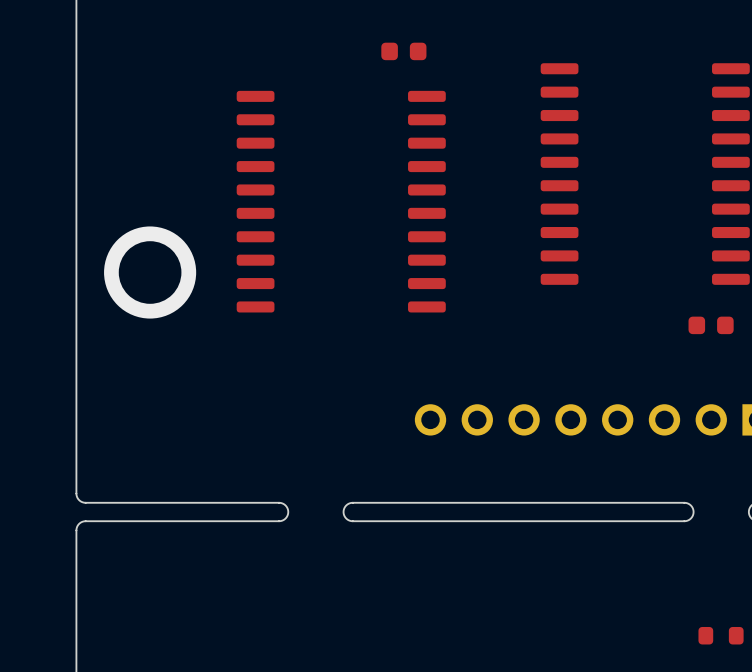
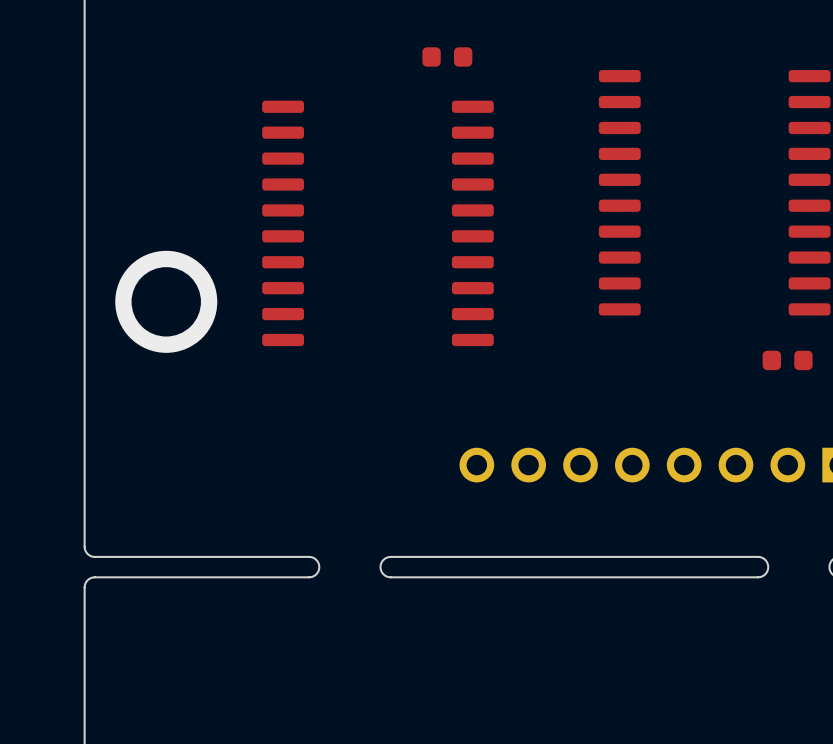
part: (721, 635) -> none

